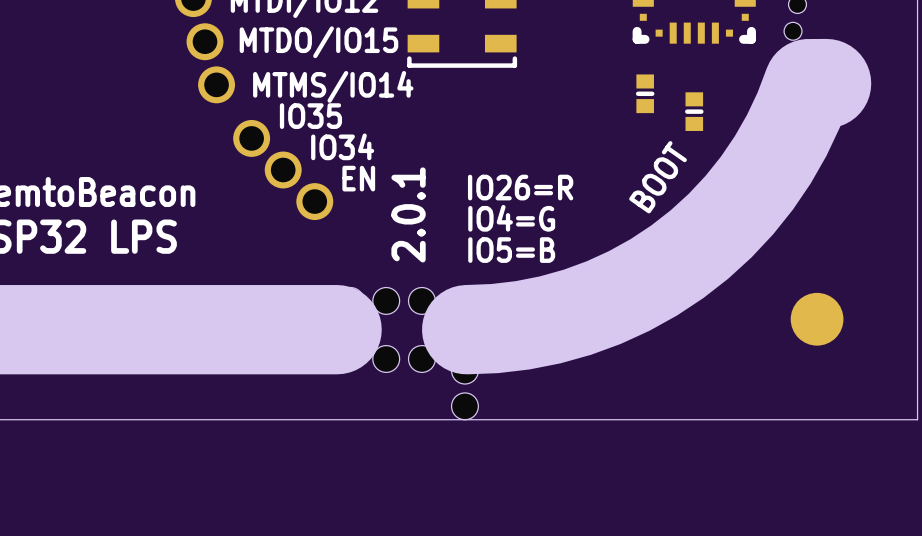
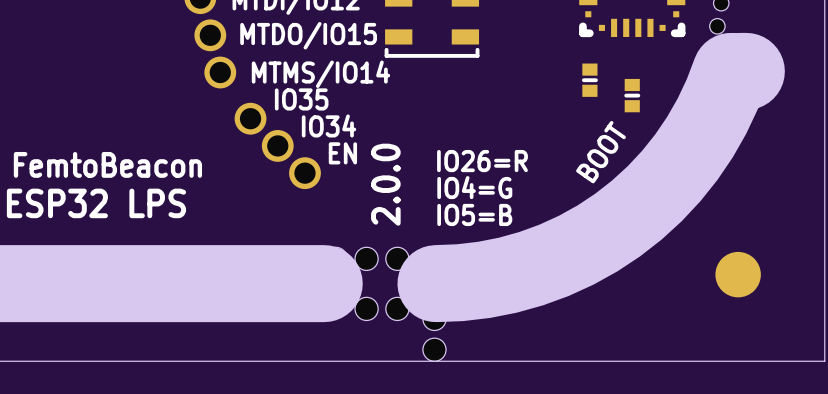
text: 2.0.1 (408, 214) -> 2.0.0 (385, 184)

